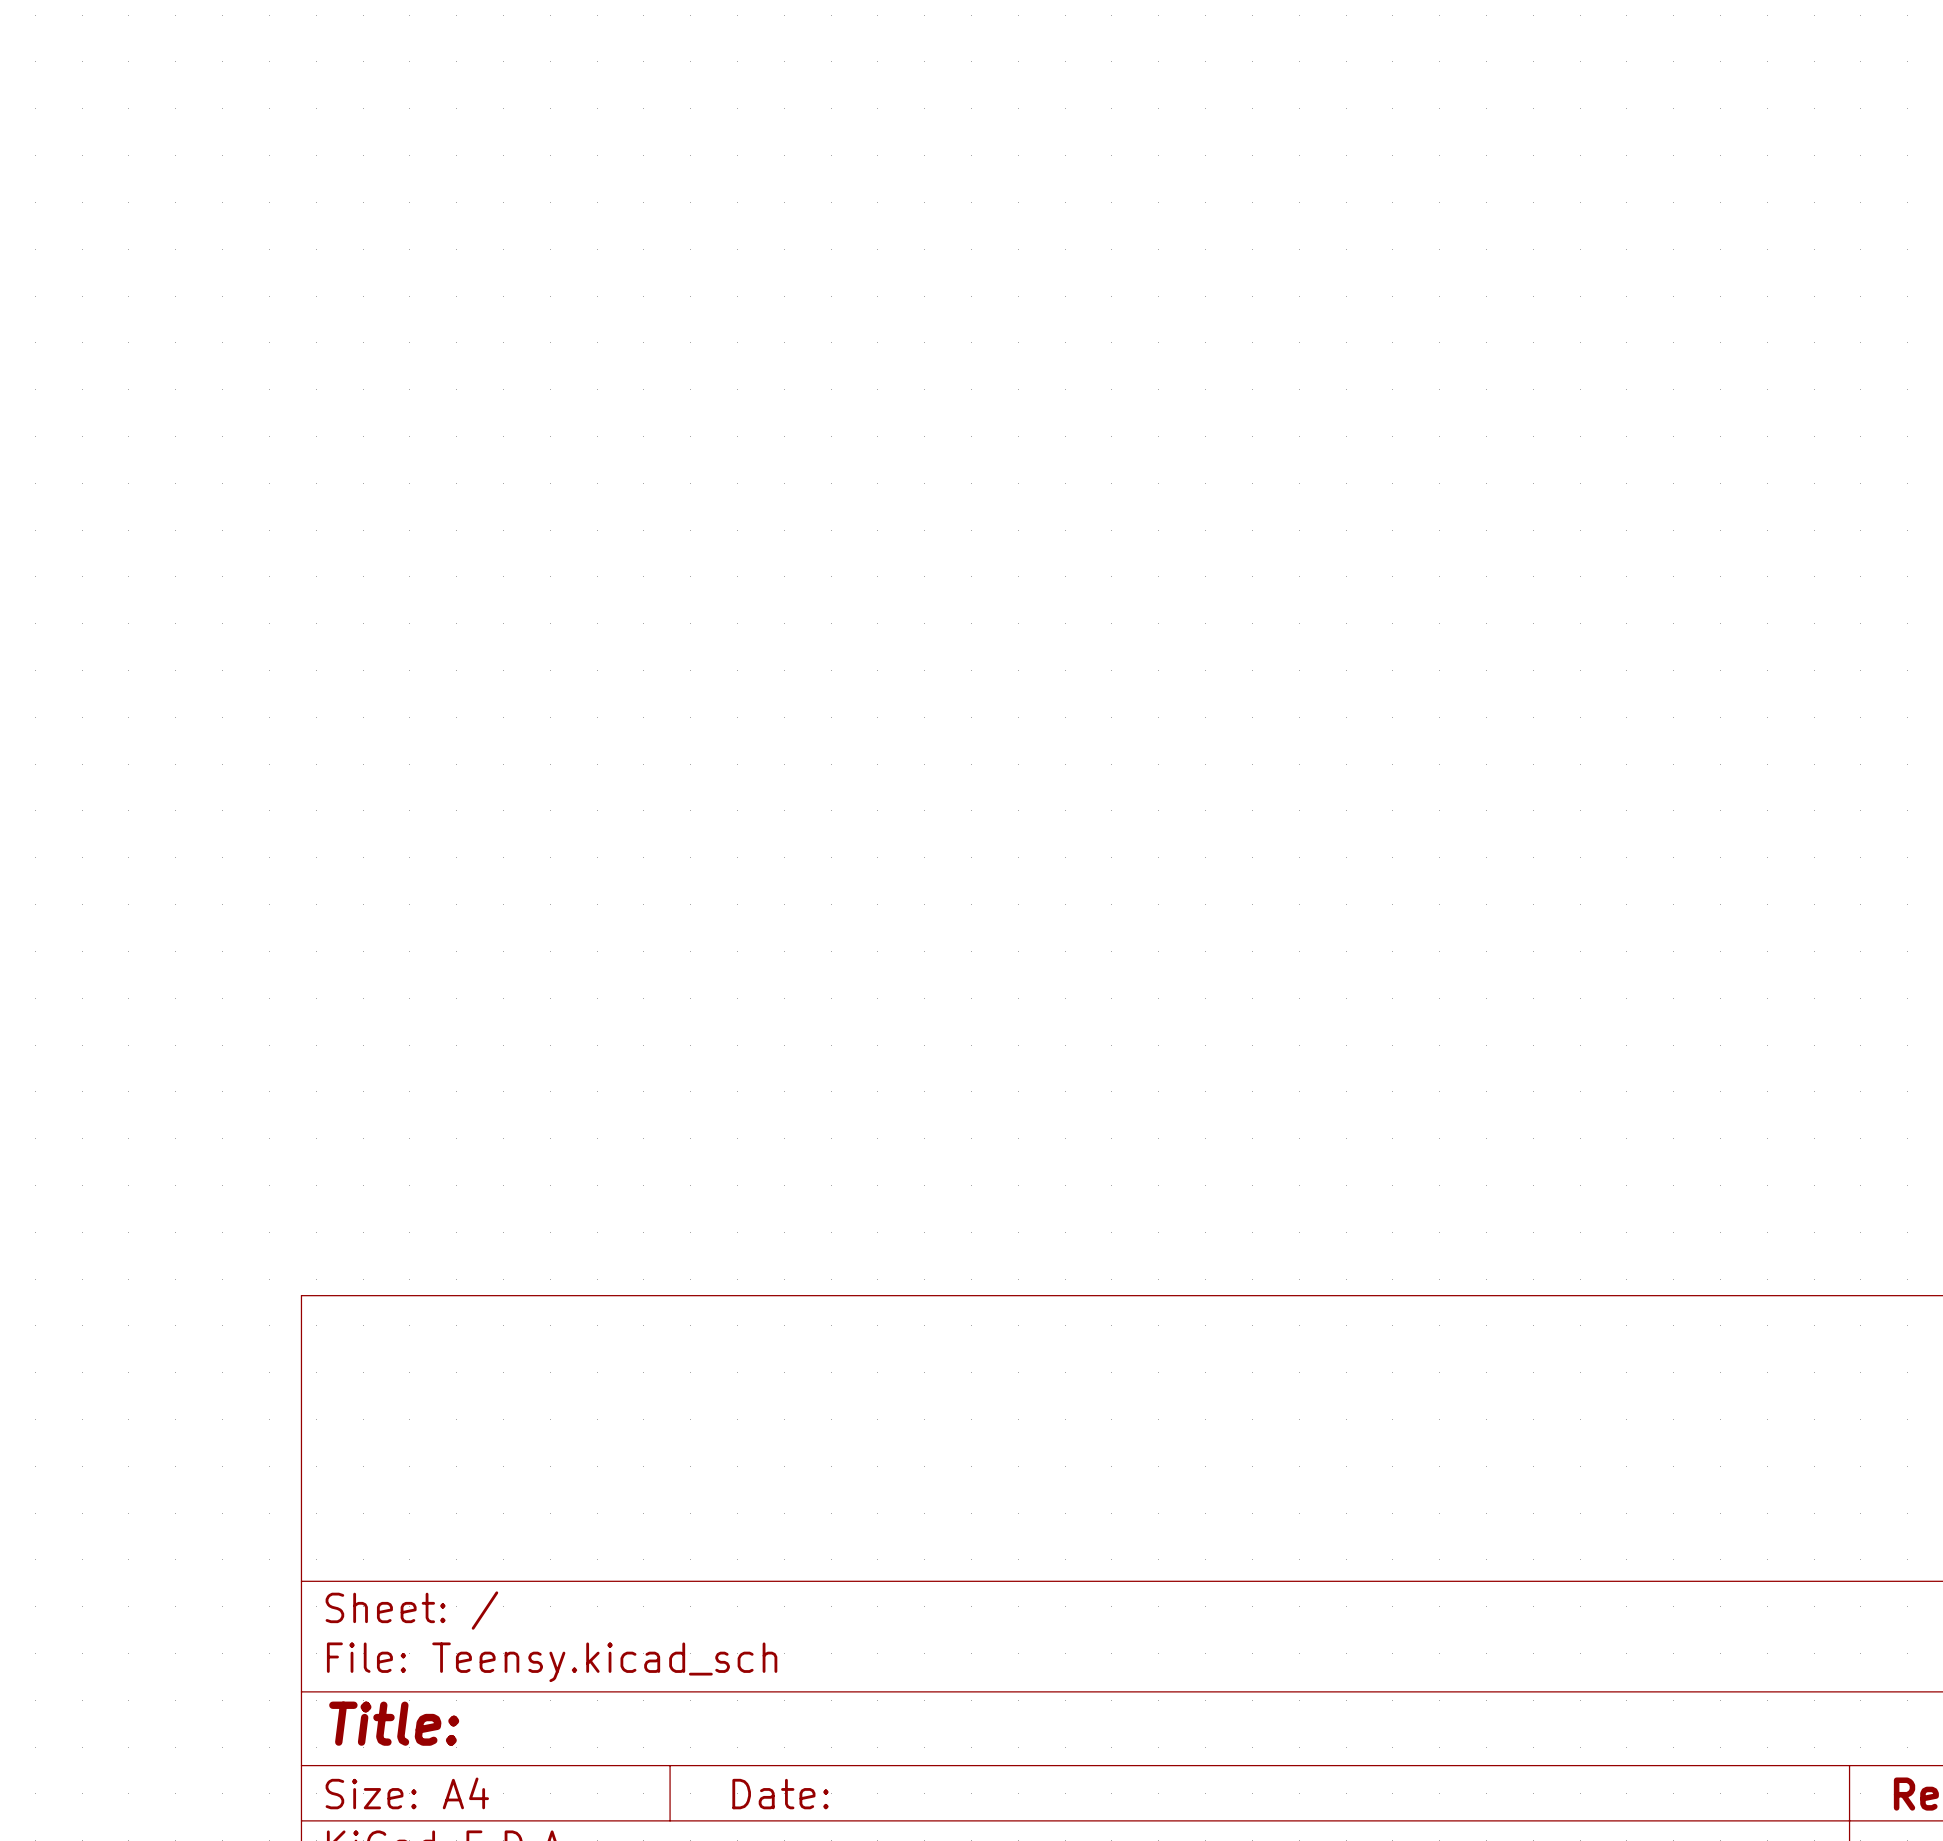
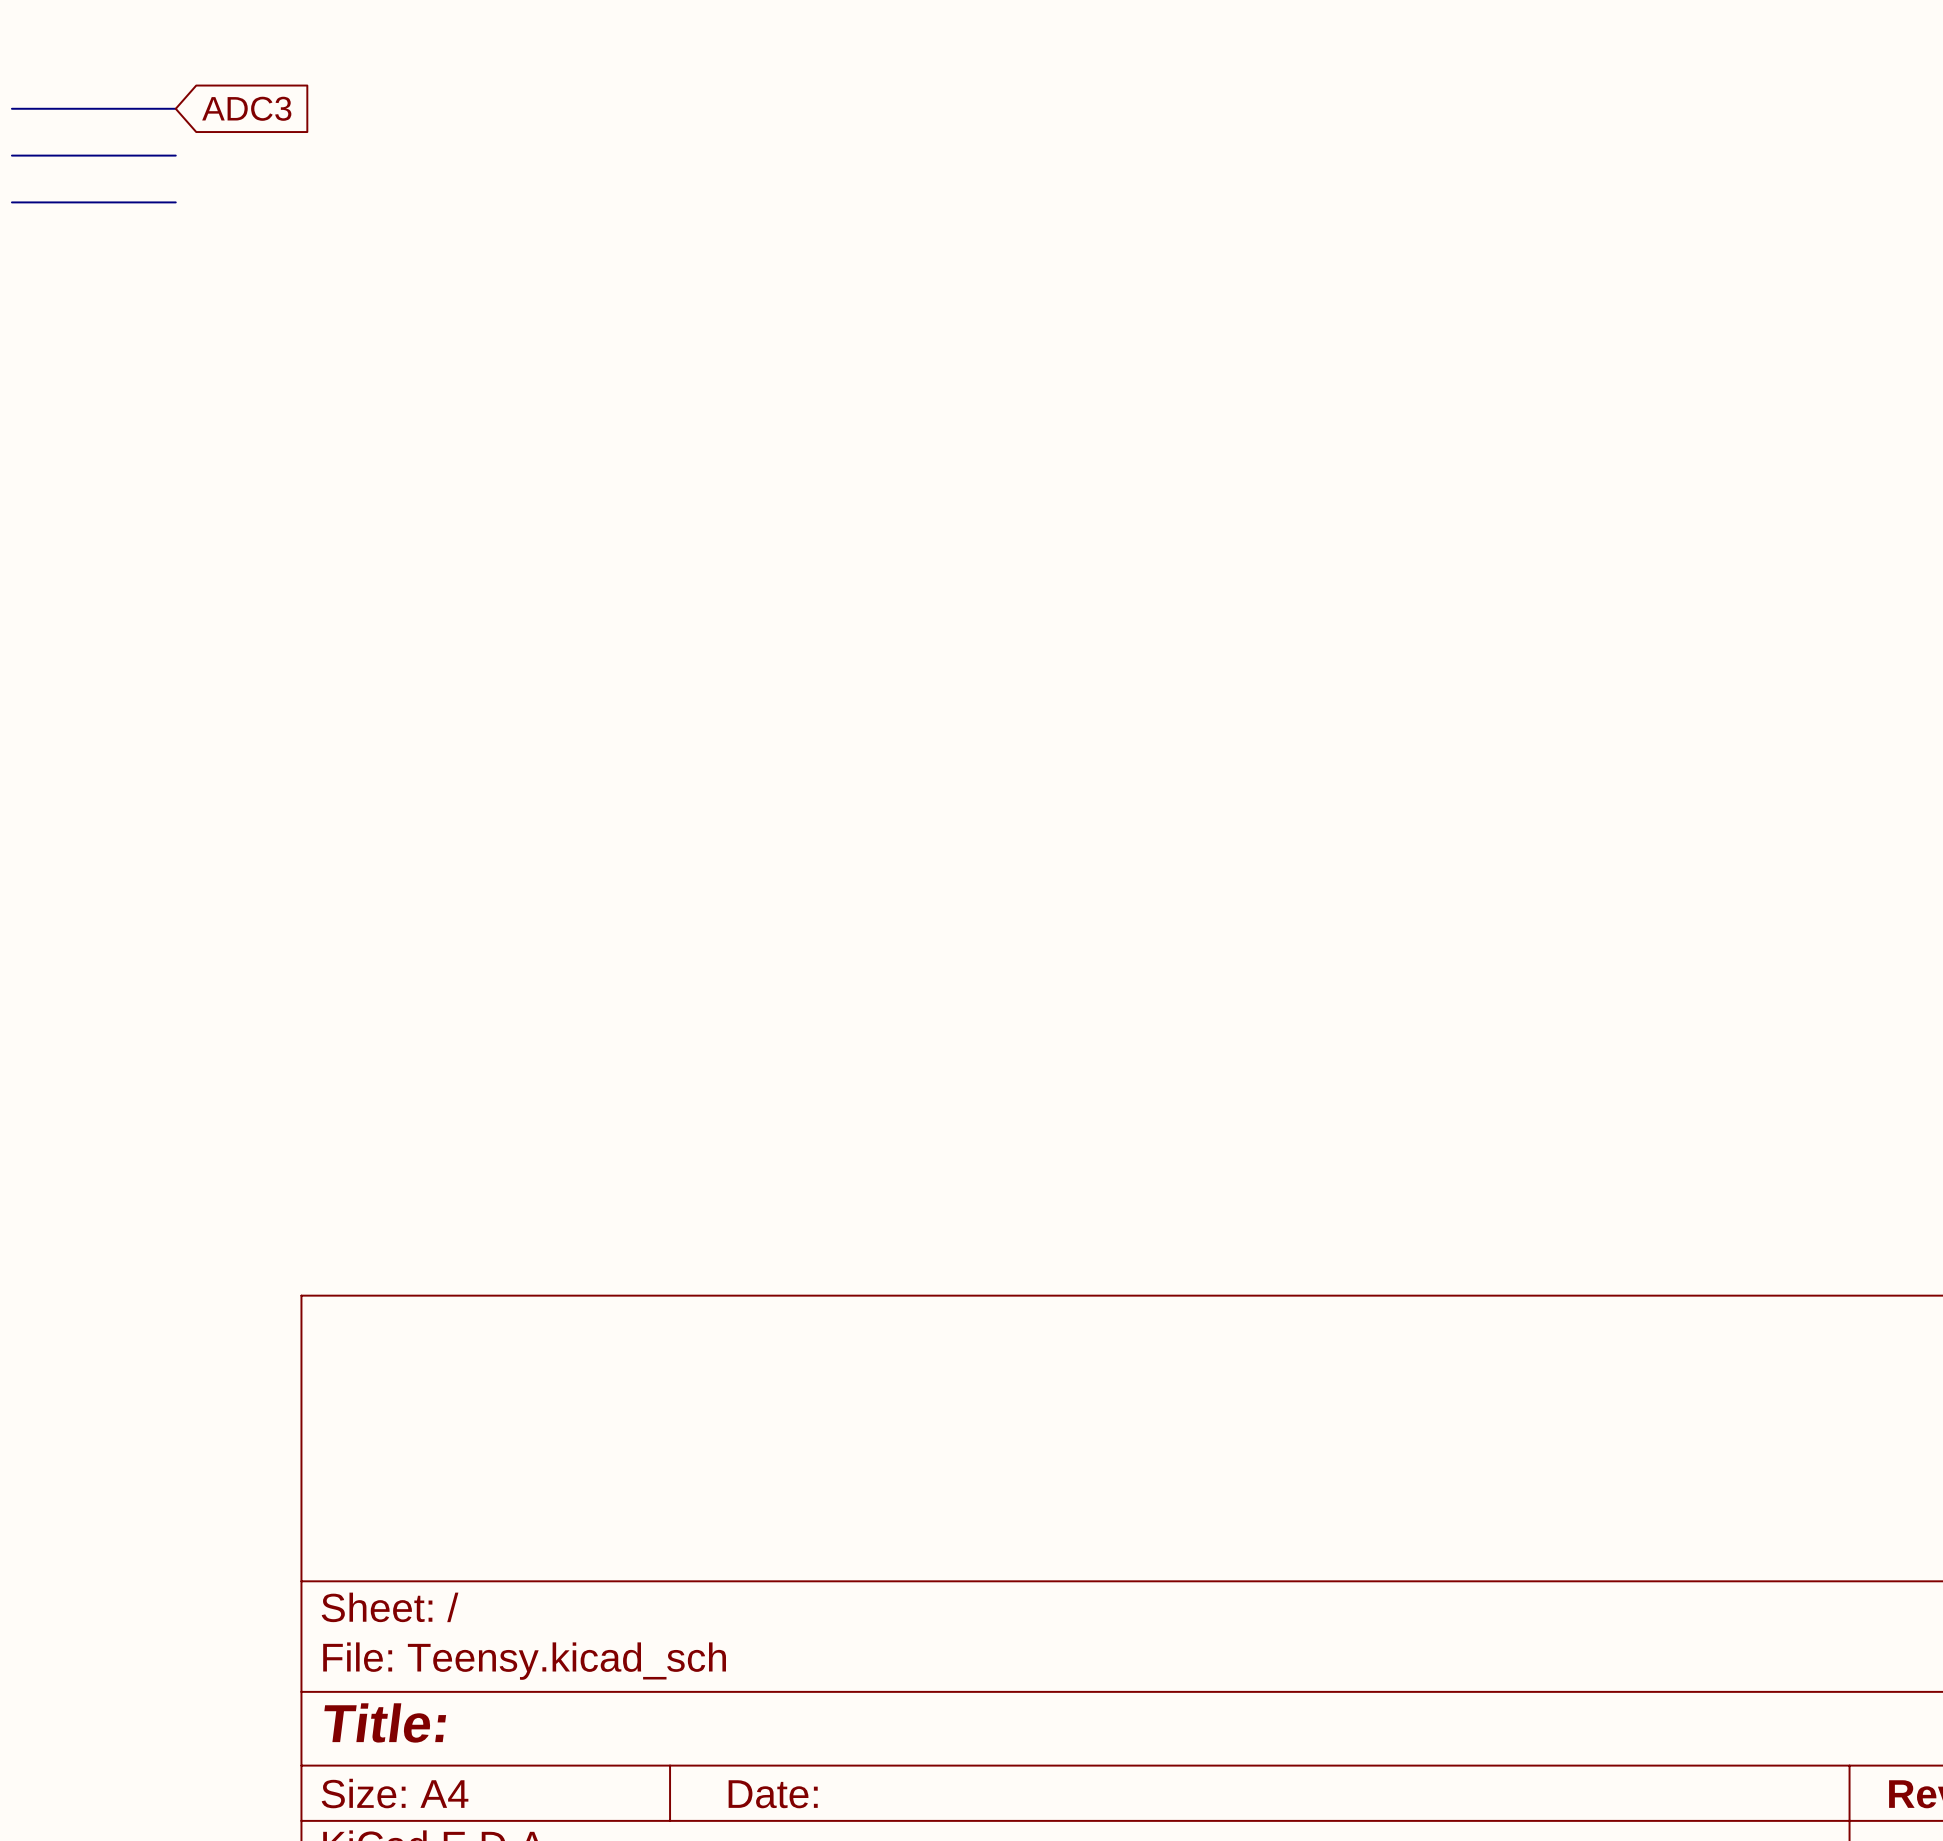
wire: none -> (11, 108) (175, 108)
global label: none -> ADC3 (246, 108)
wire: none -> (11, 155) (175, 155)
wire: none -> (11, 202) (175, 202)

